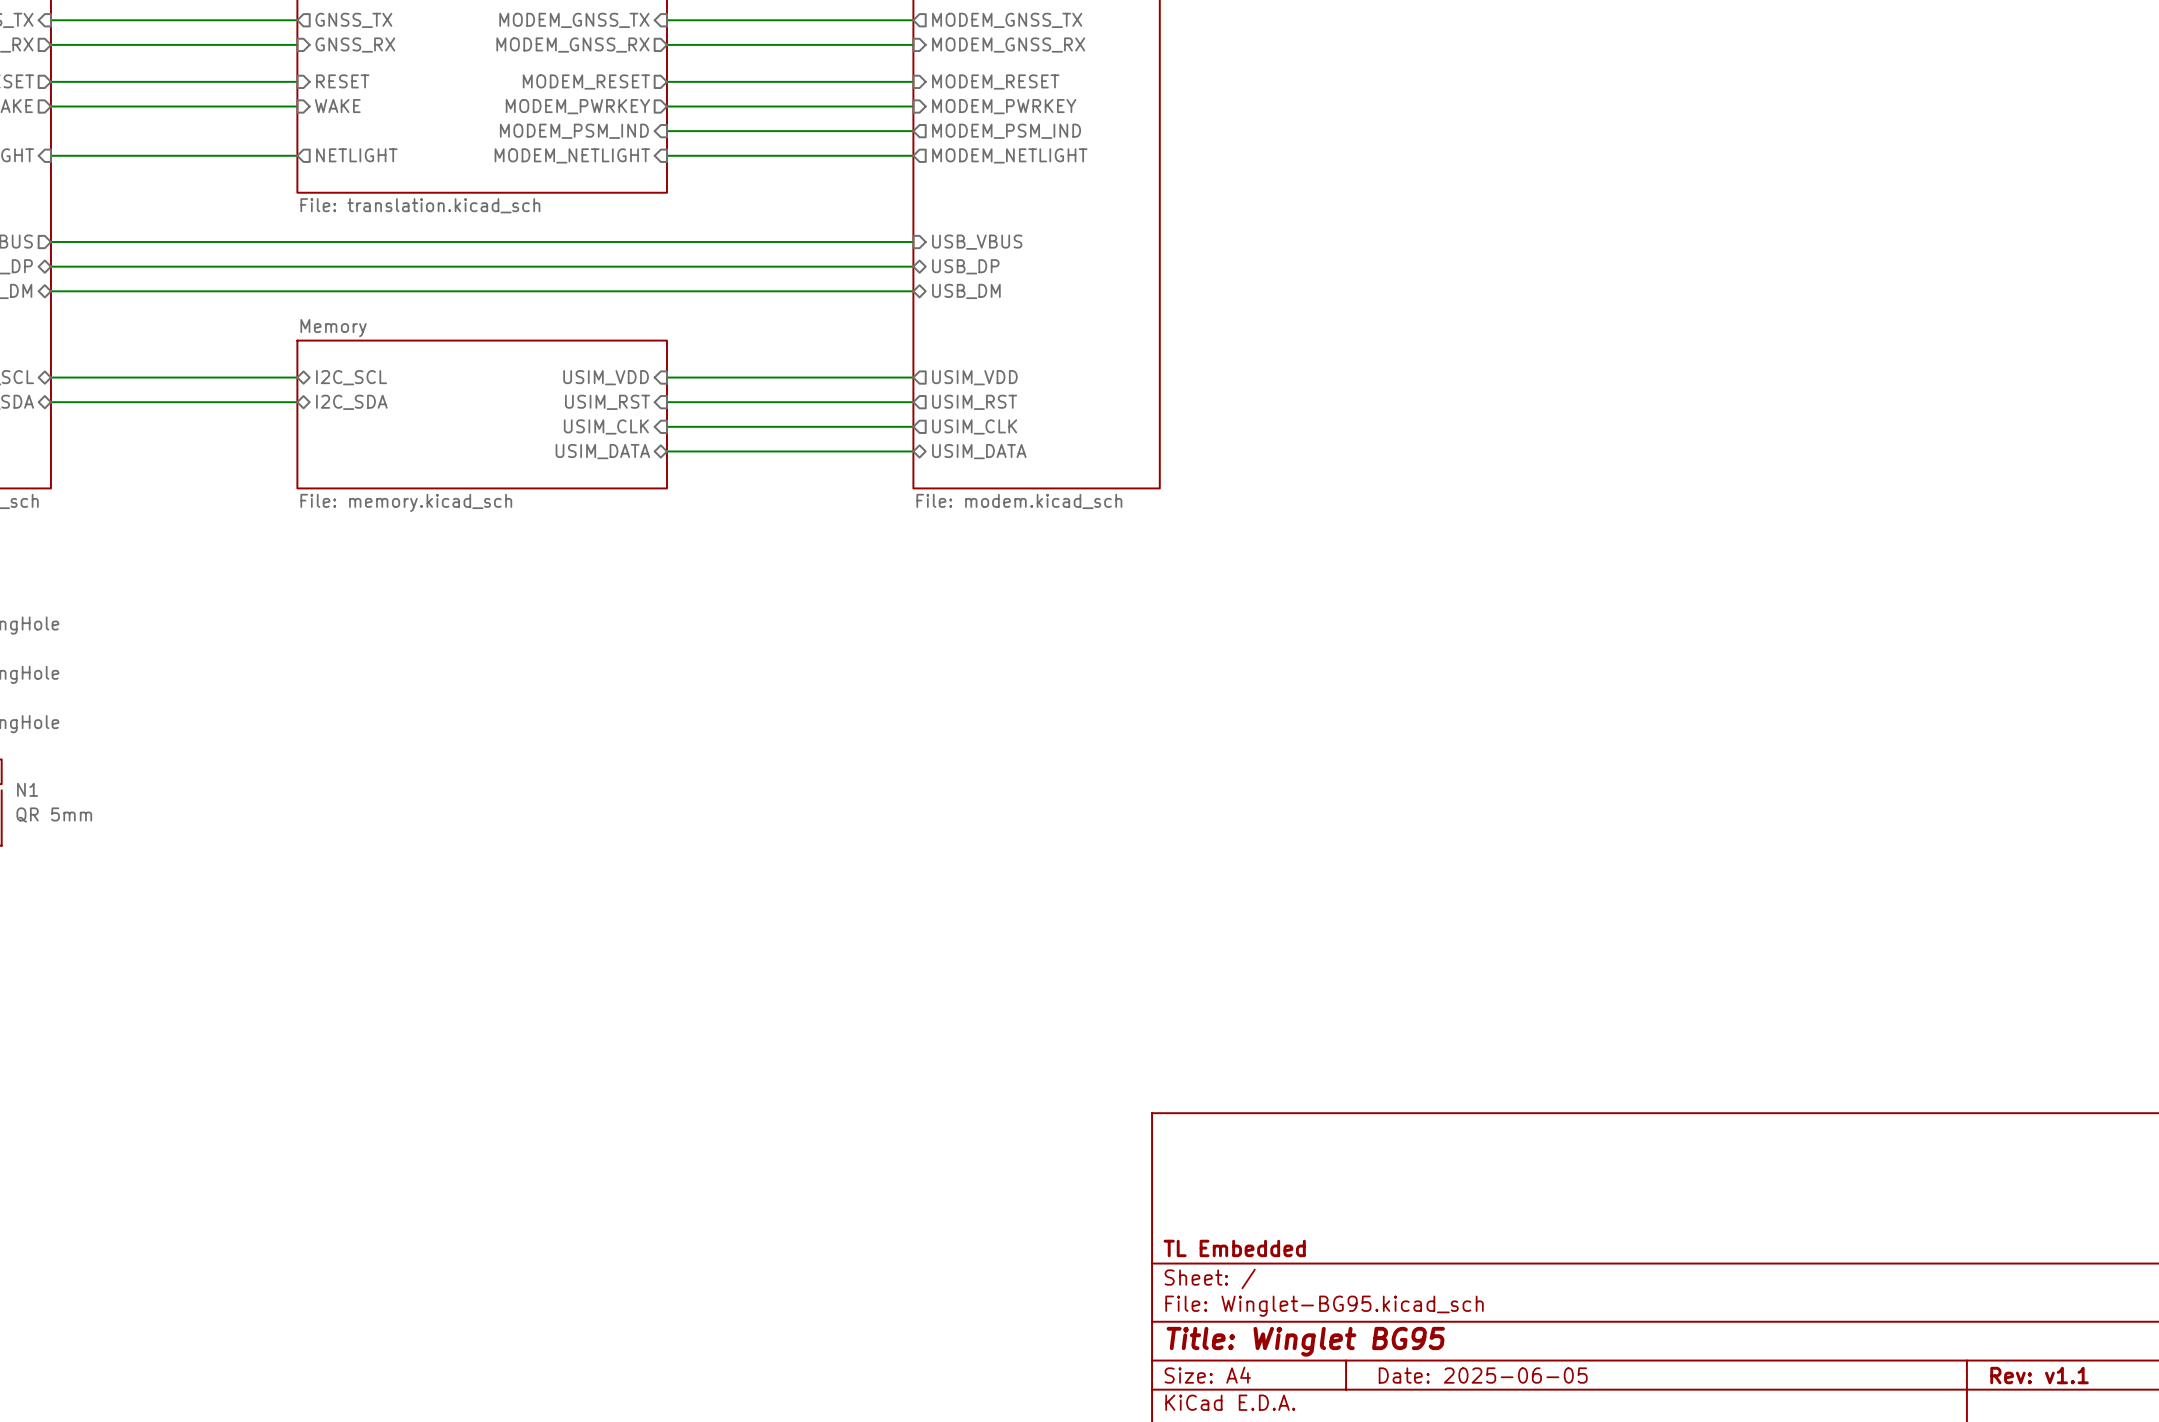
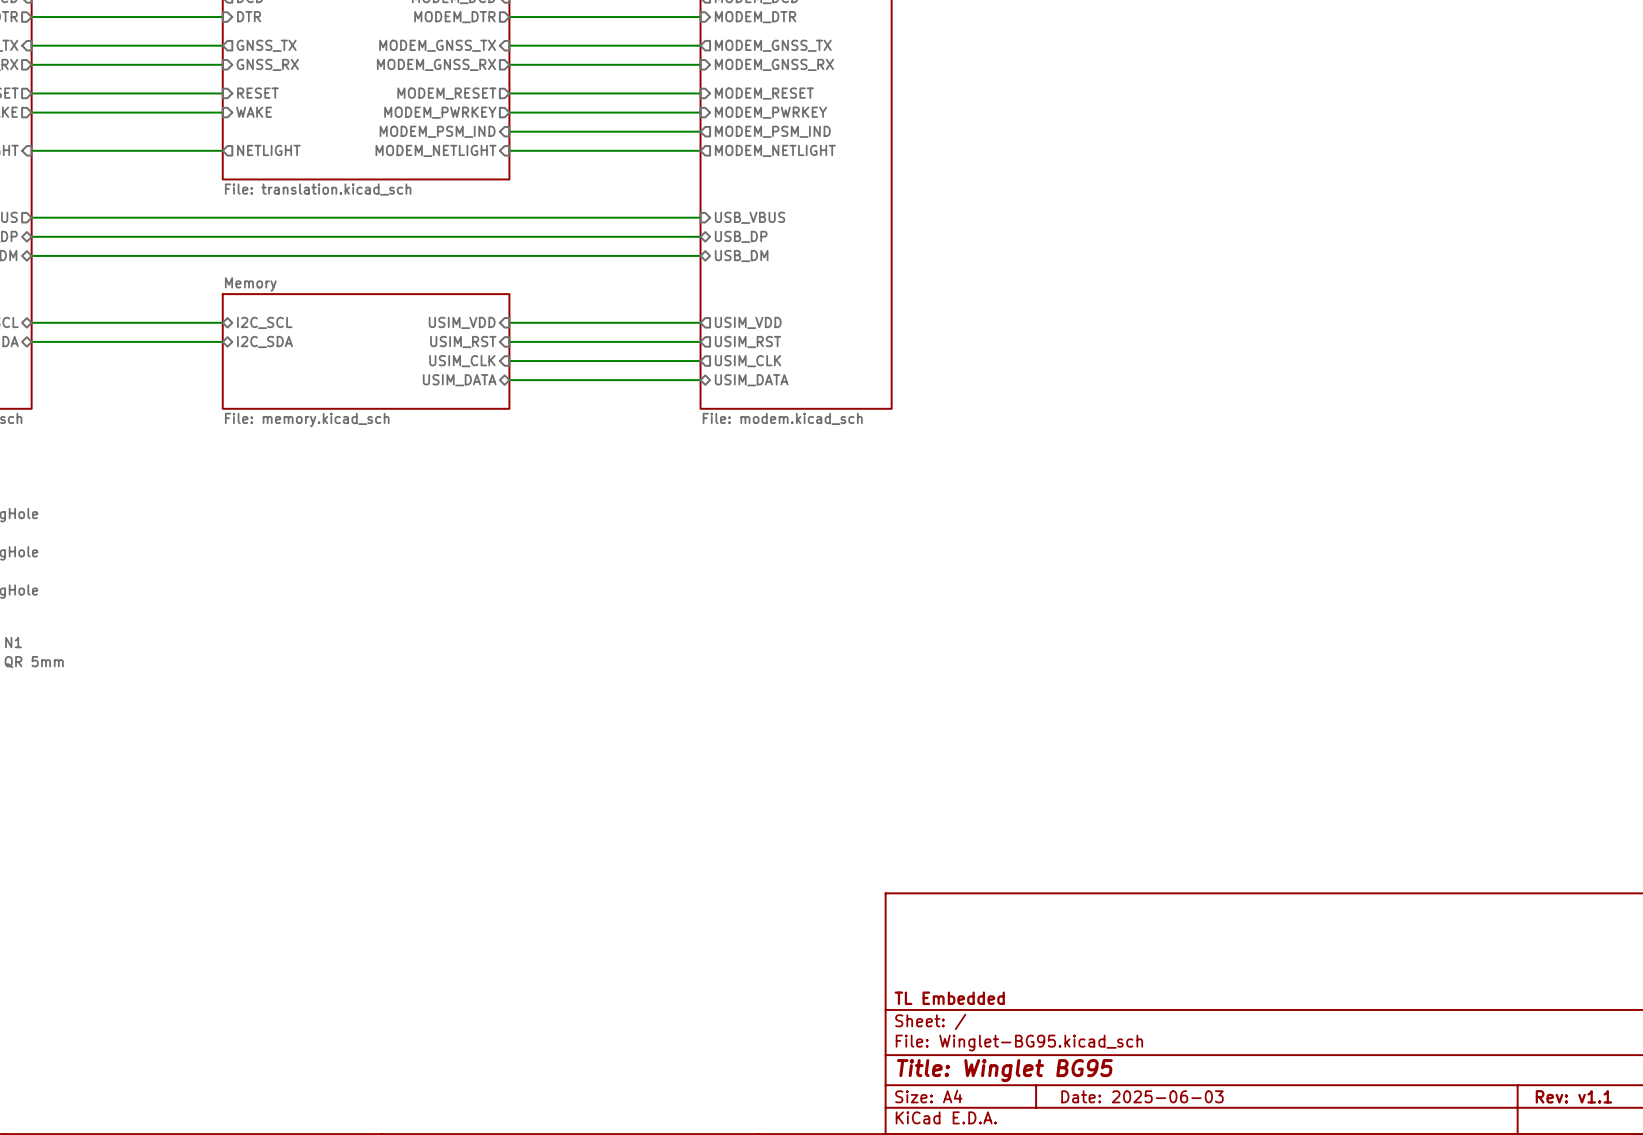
title block: Date: 2025-06-05 (1483, 1375) -> Date: 2025-06-03 (1142, 1096)

